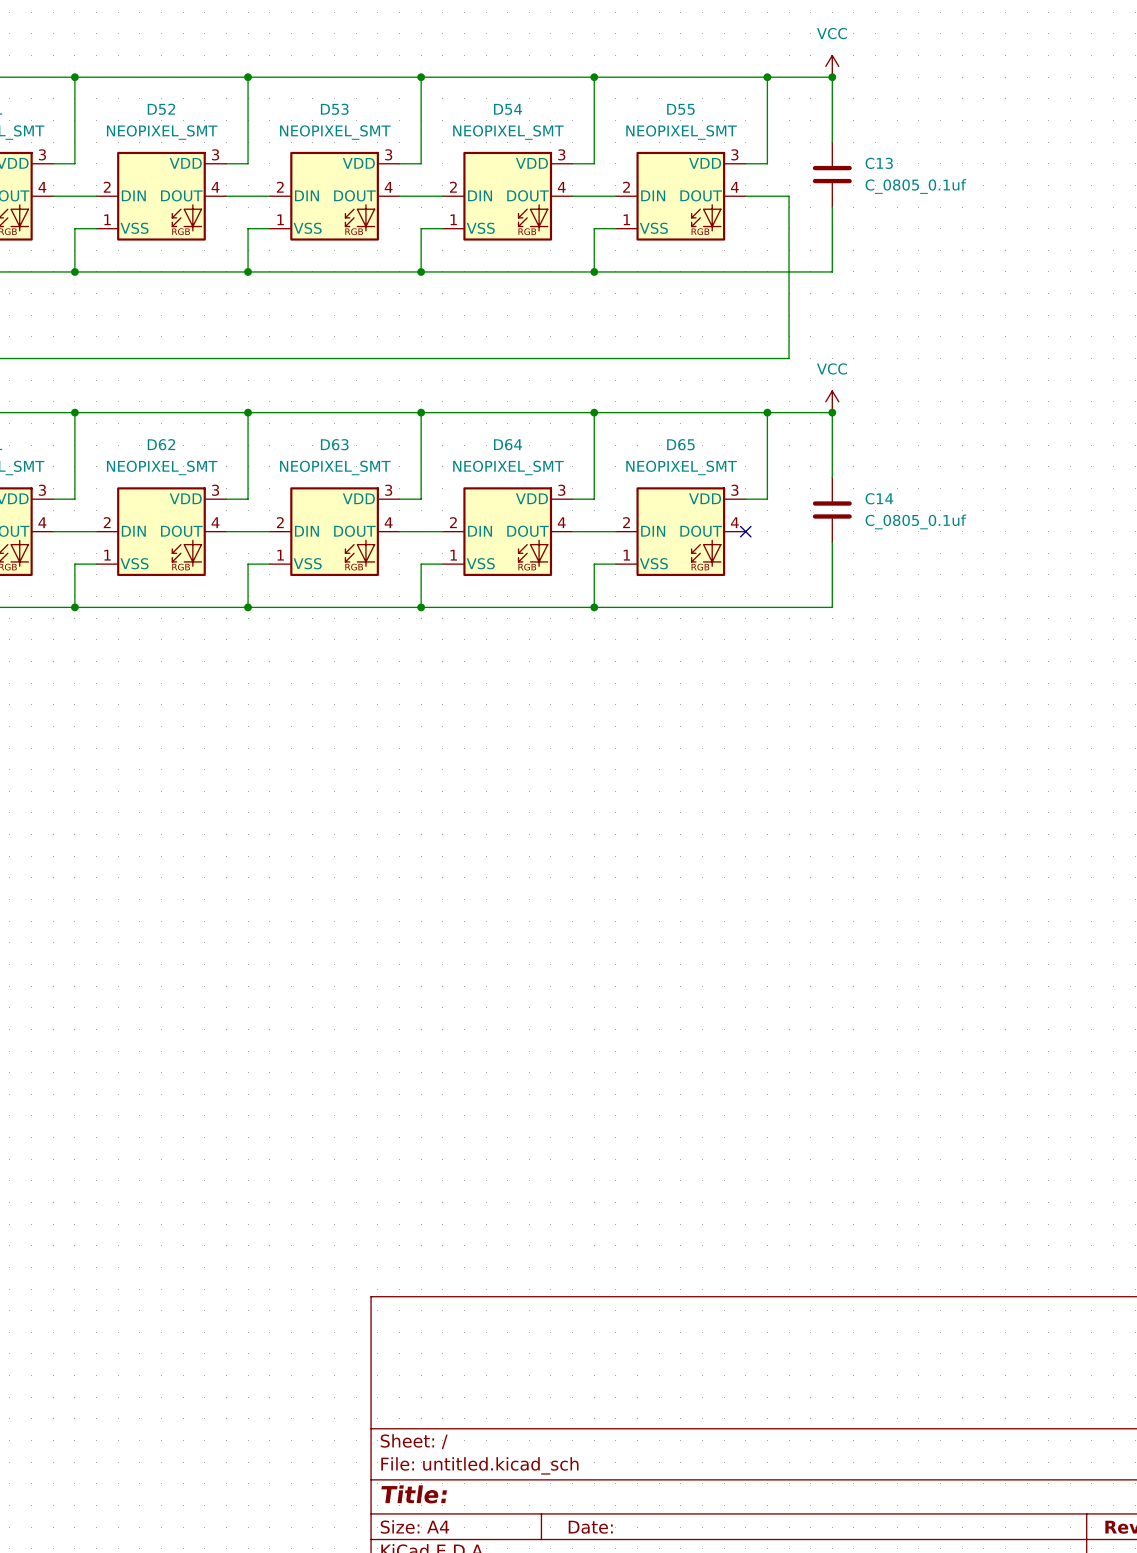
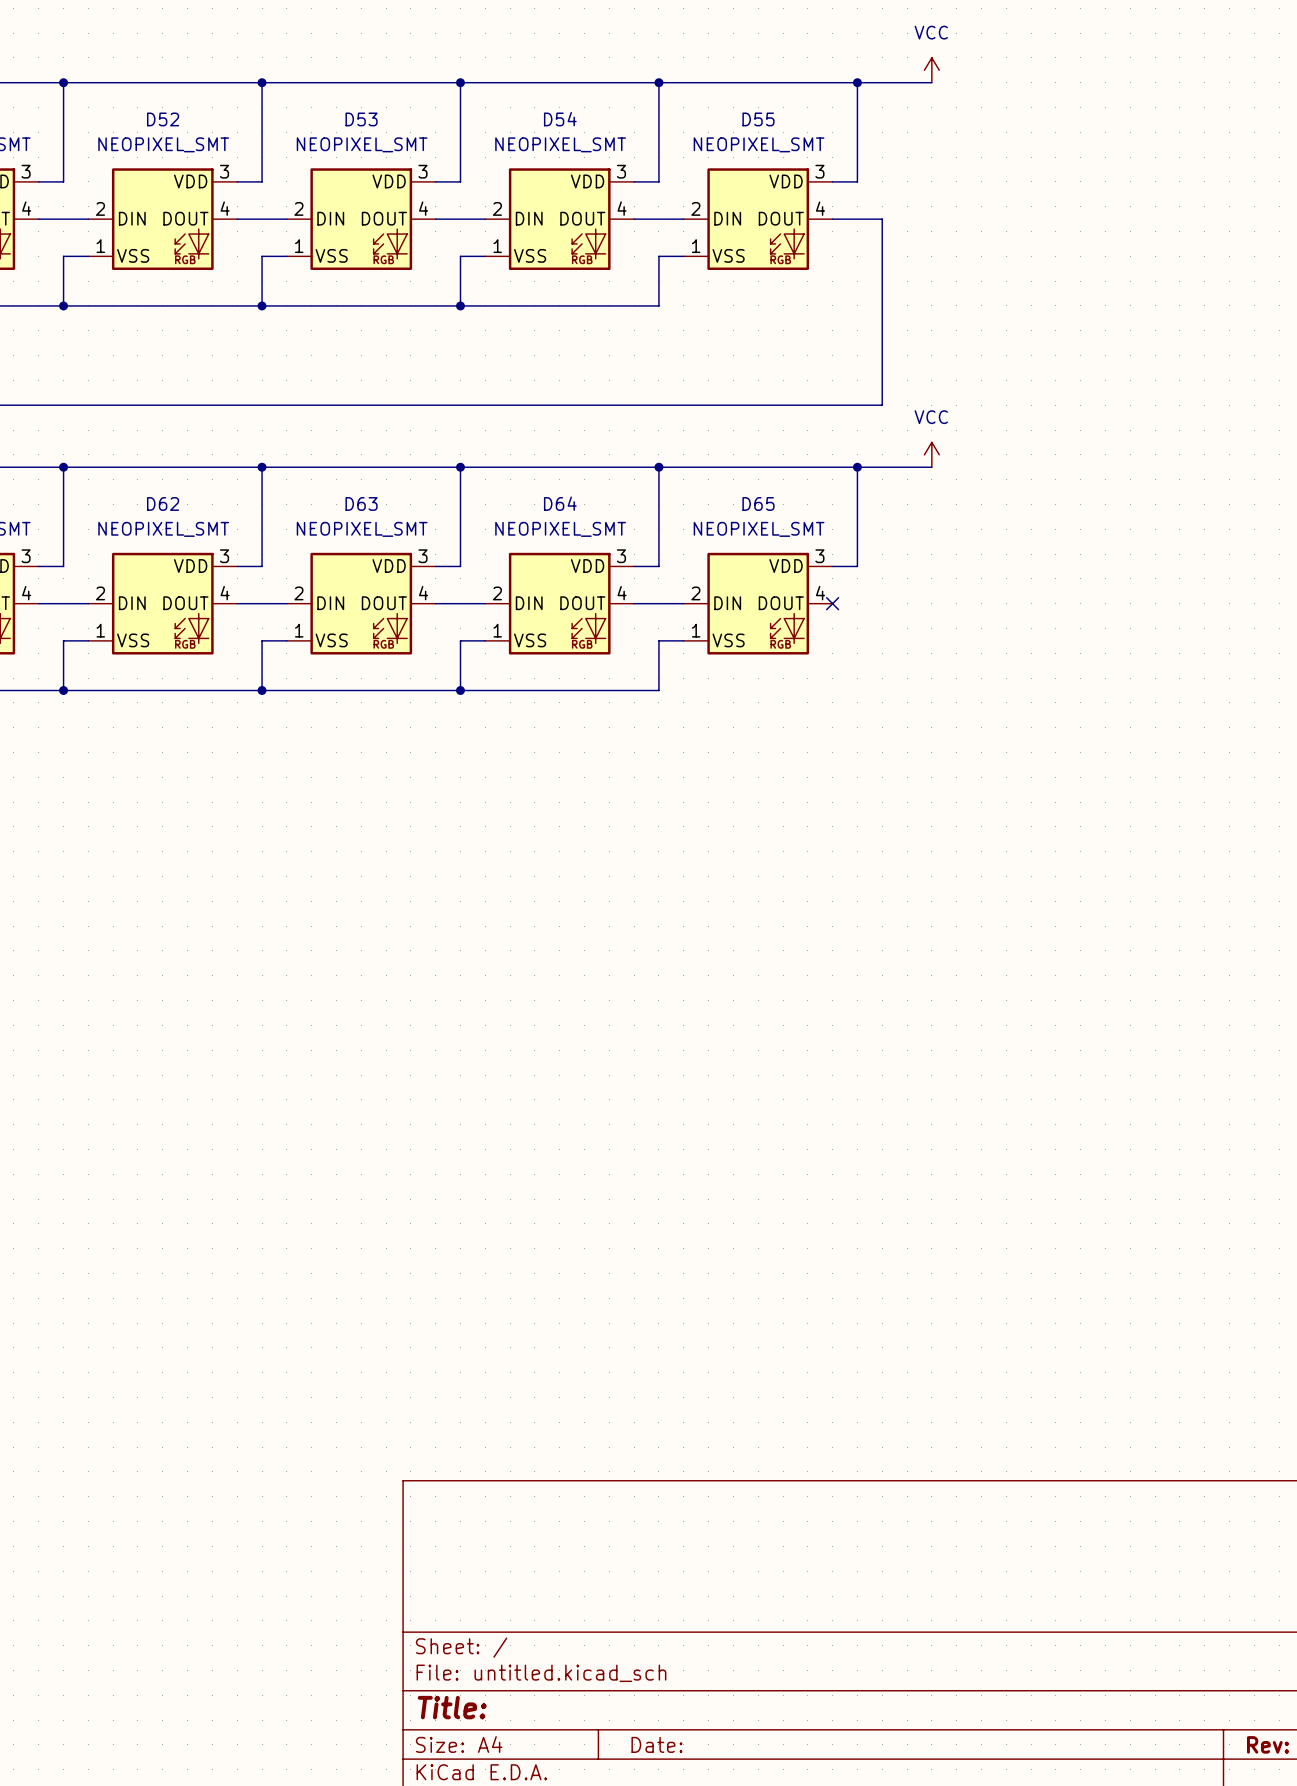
wire: (832, 77) (832, 142) -> none
junction: (832, 77) -> none
C13: C_0805_0.1uf (832, 174) -> none
wire: (832, 207) (832, 271) (594, 271) -> none
junction: (594, 271) -> none
wire: (832, 412) (832, 477) -> none
junction: (832, 412) -> none
C14: C_0805_0.1uf (832, 510) -> none
wire: (832, 542) (832, 607) (594, 607) -> none
junction: (594, 607) -> none

